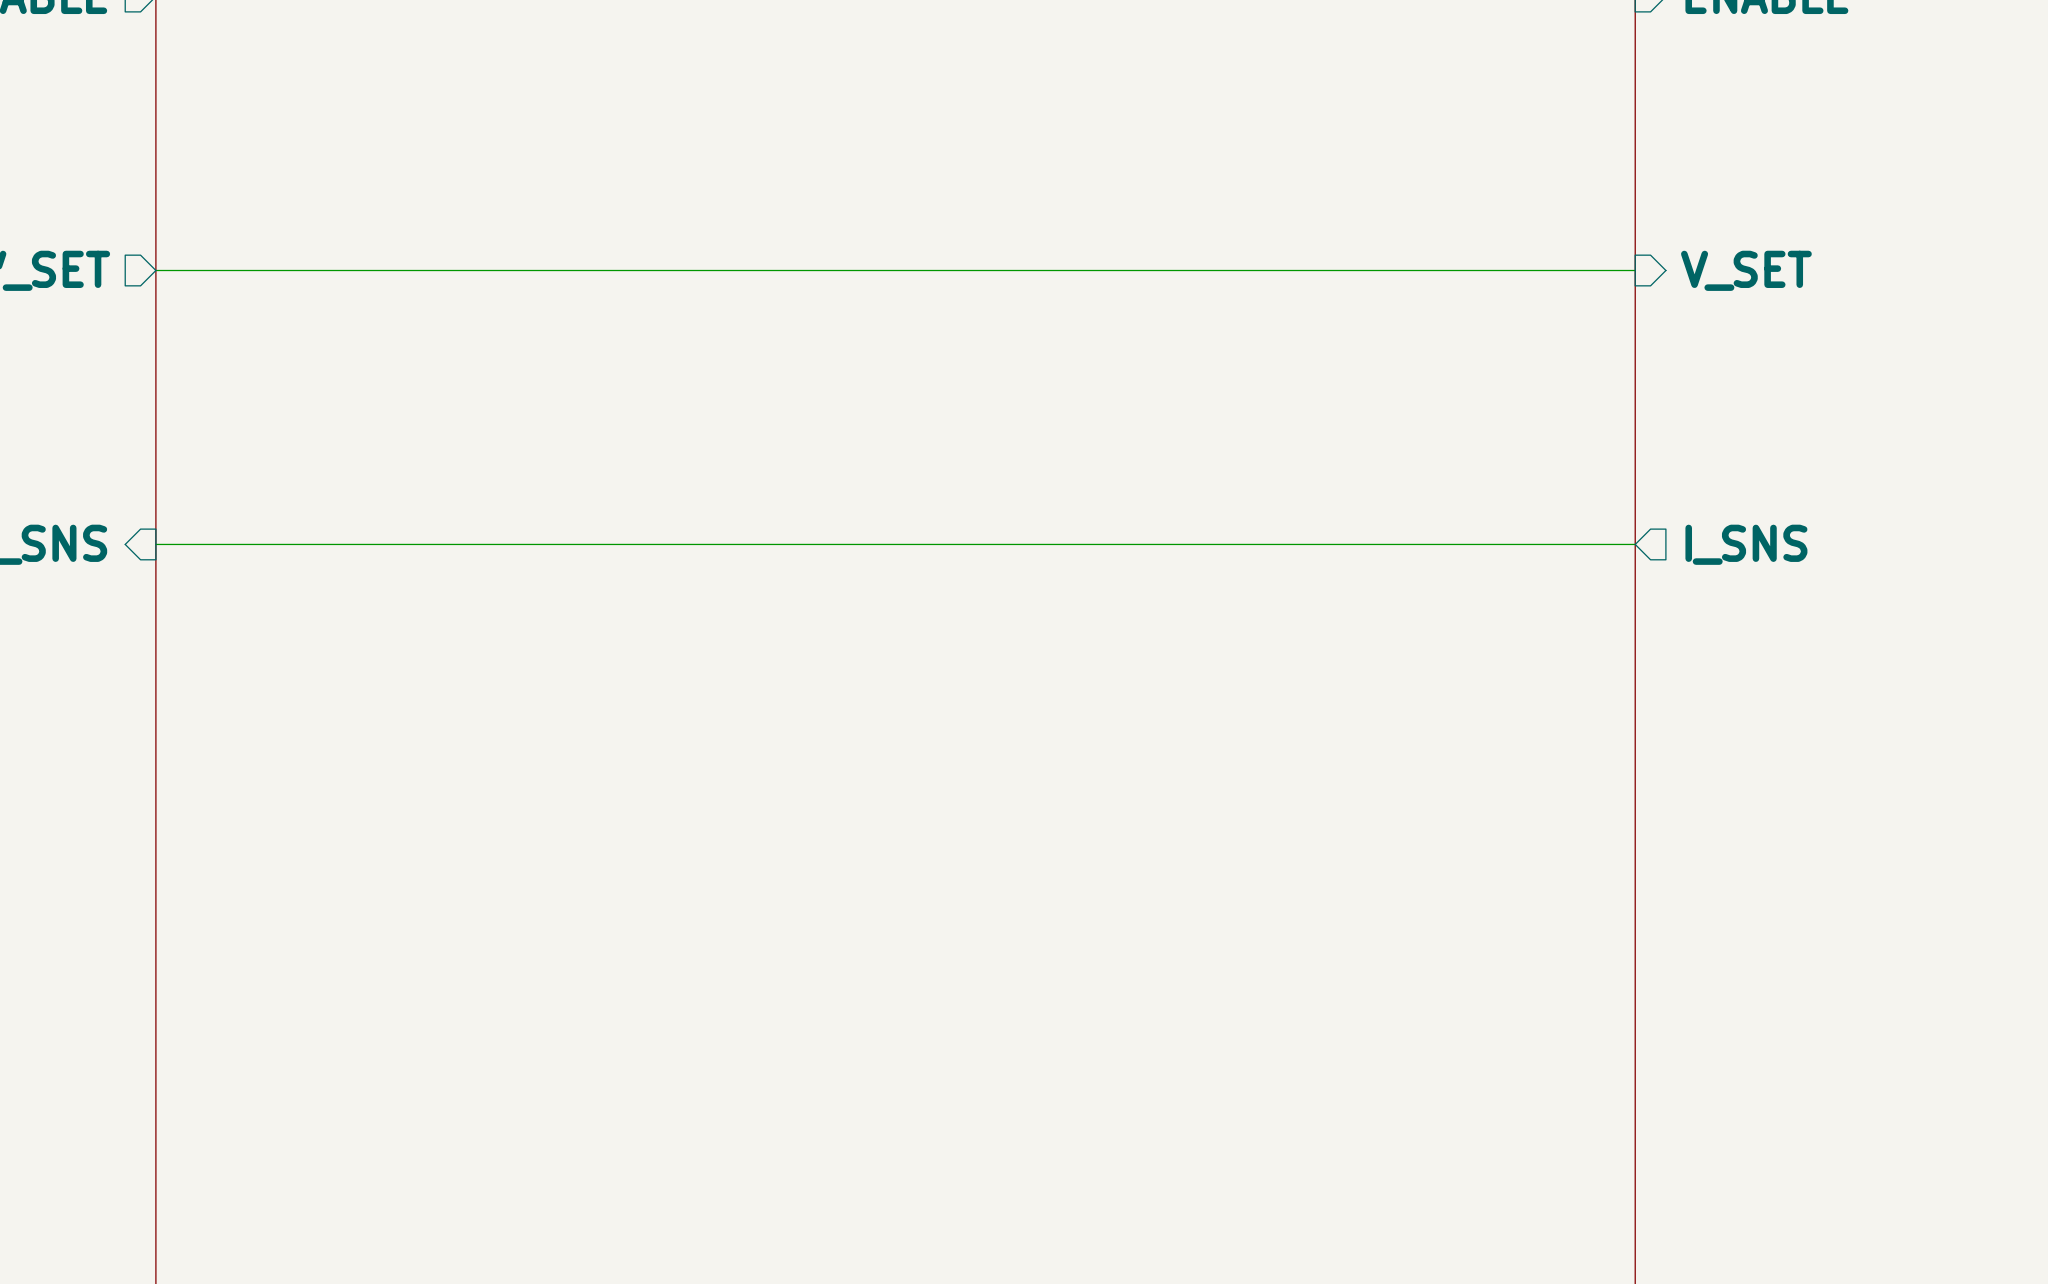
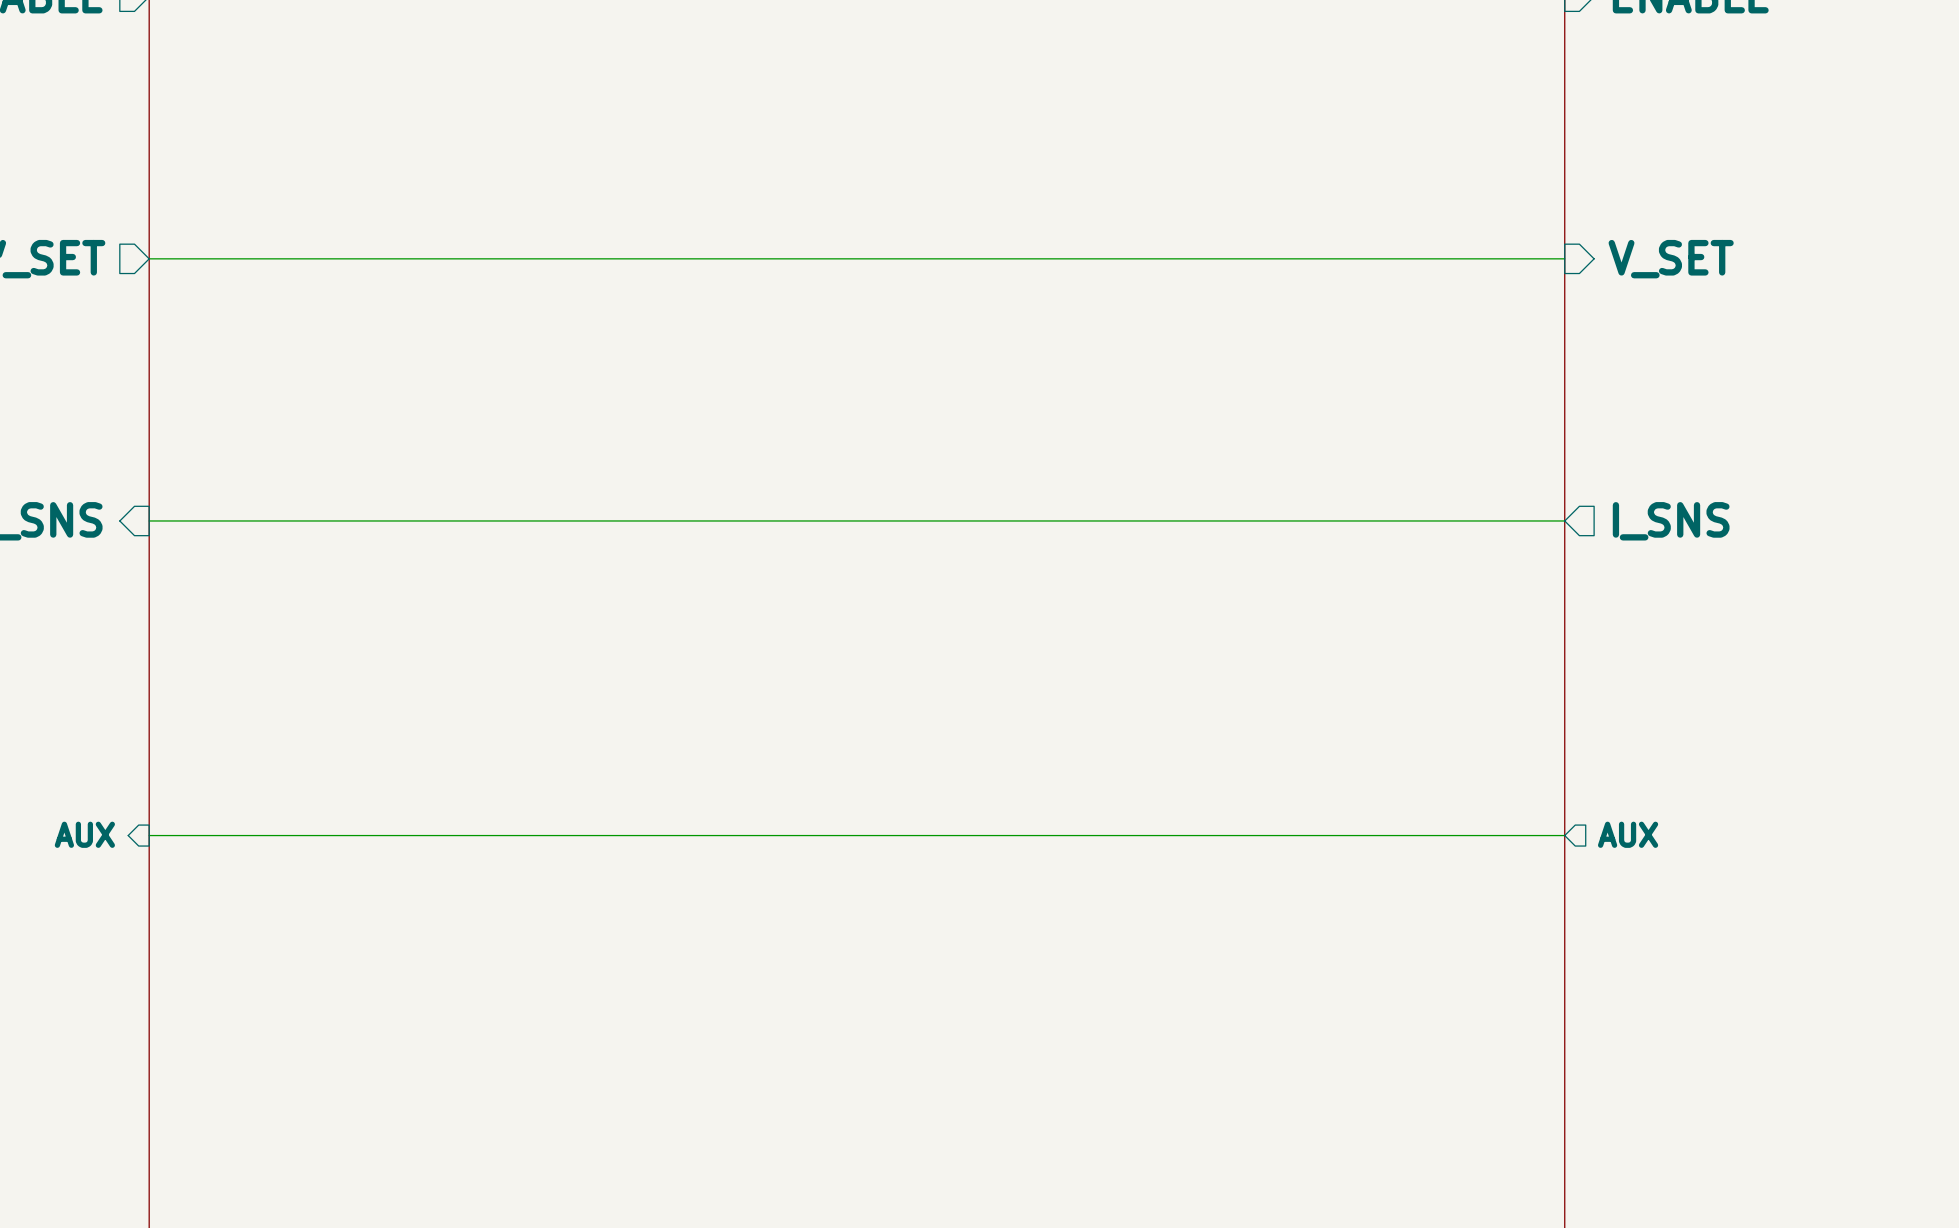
sheet pin: none -> AUX (84, 834)
sheet pin: none -> AUX (1628, 834)
wire: none -> (149, 835) (1564, 835)

